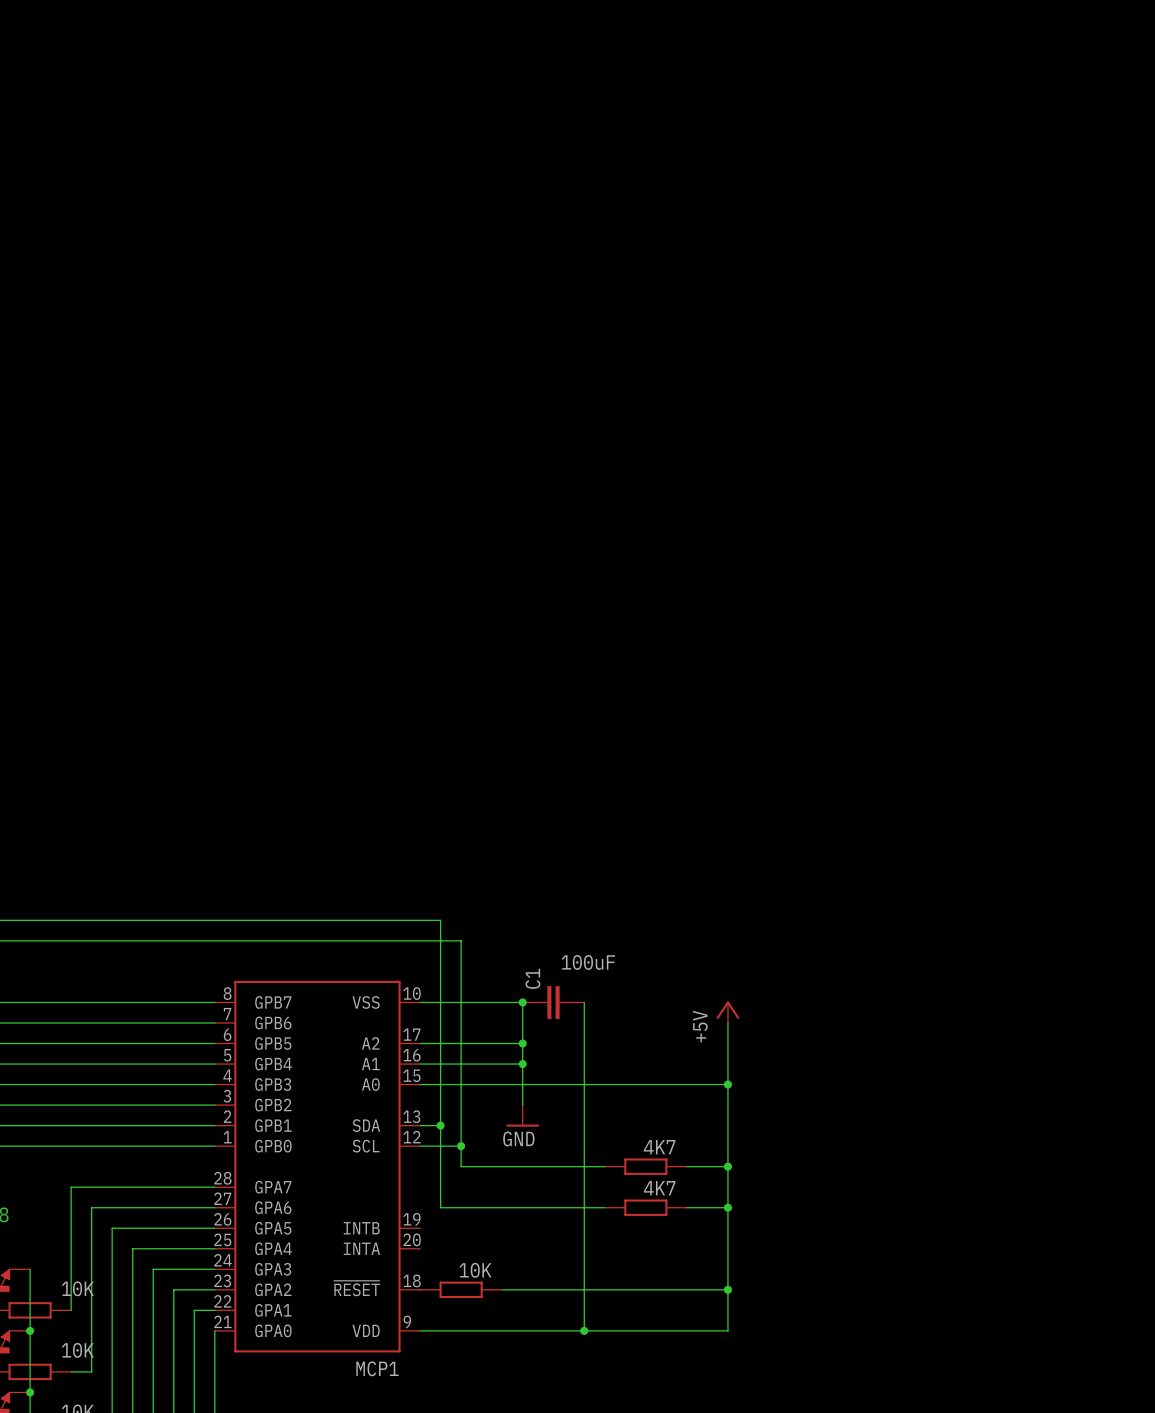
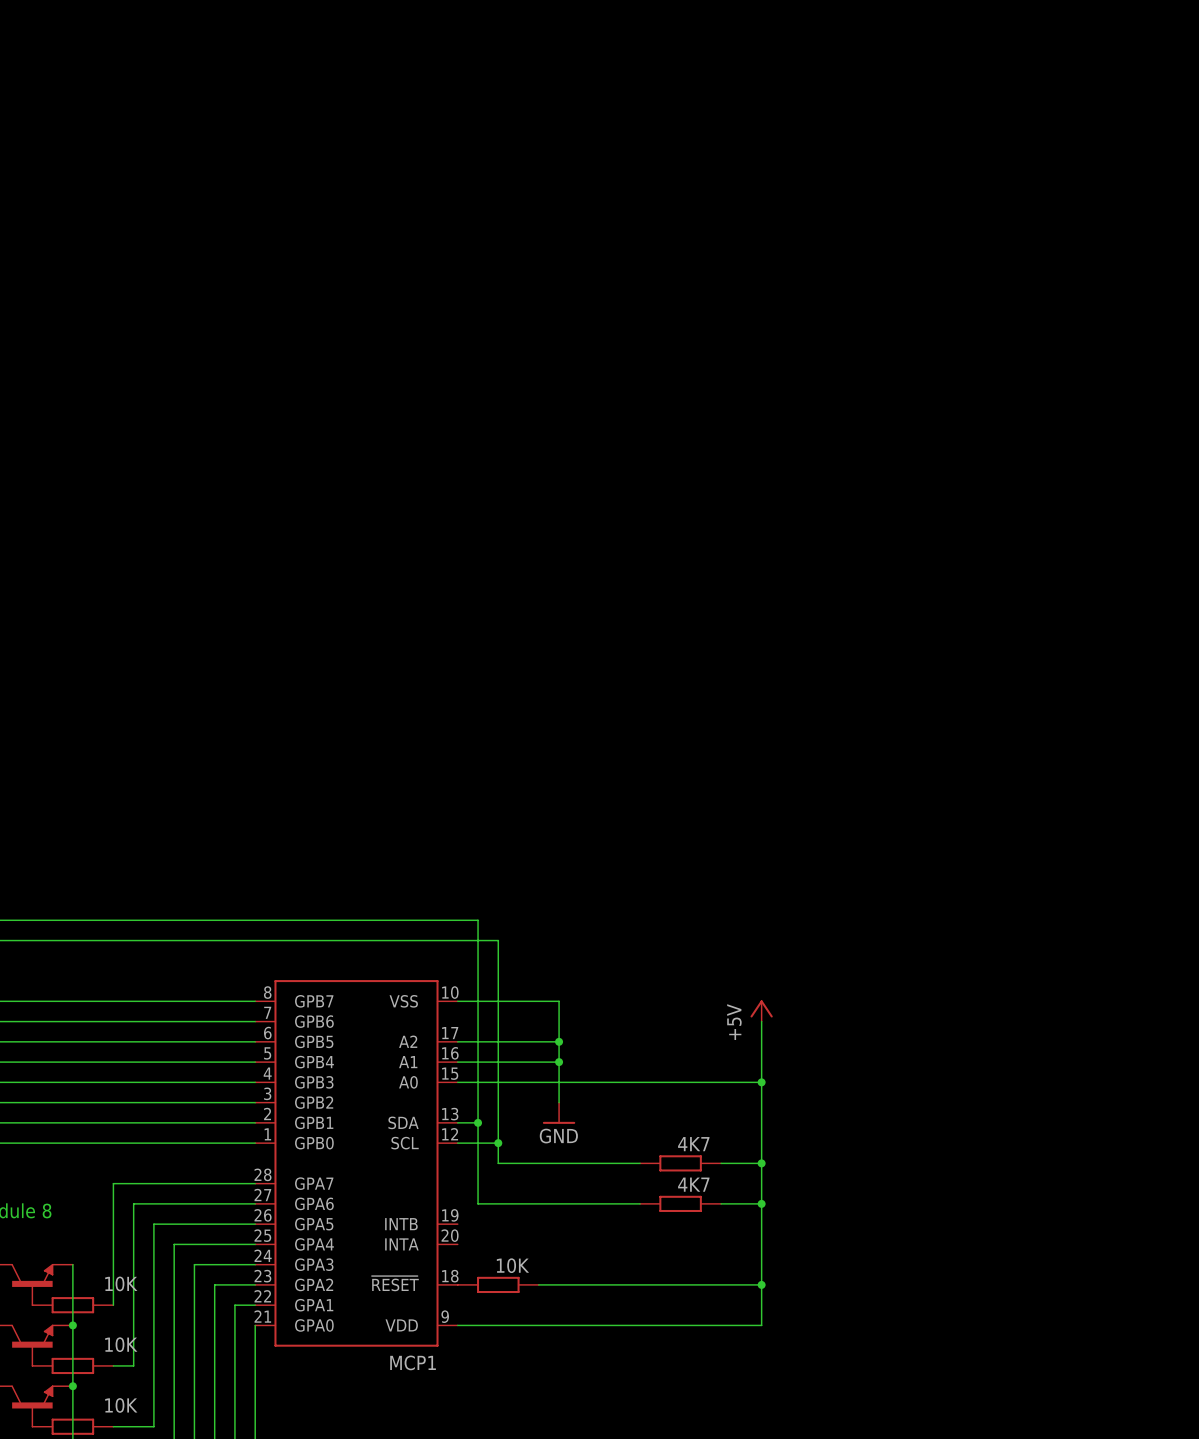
junction: (522, 1002) -> none
C1: 100uF (553, 1002) -> none
wire: (584, 1002) (584, 1330) -> none
junction: (584, 1330) -> none

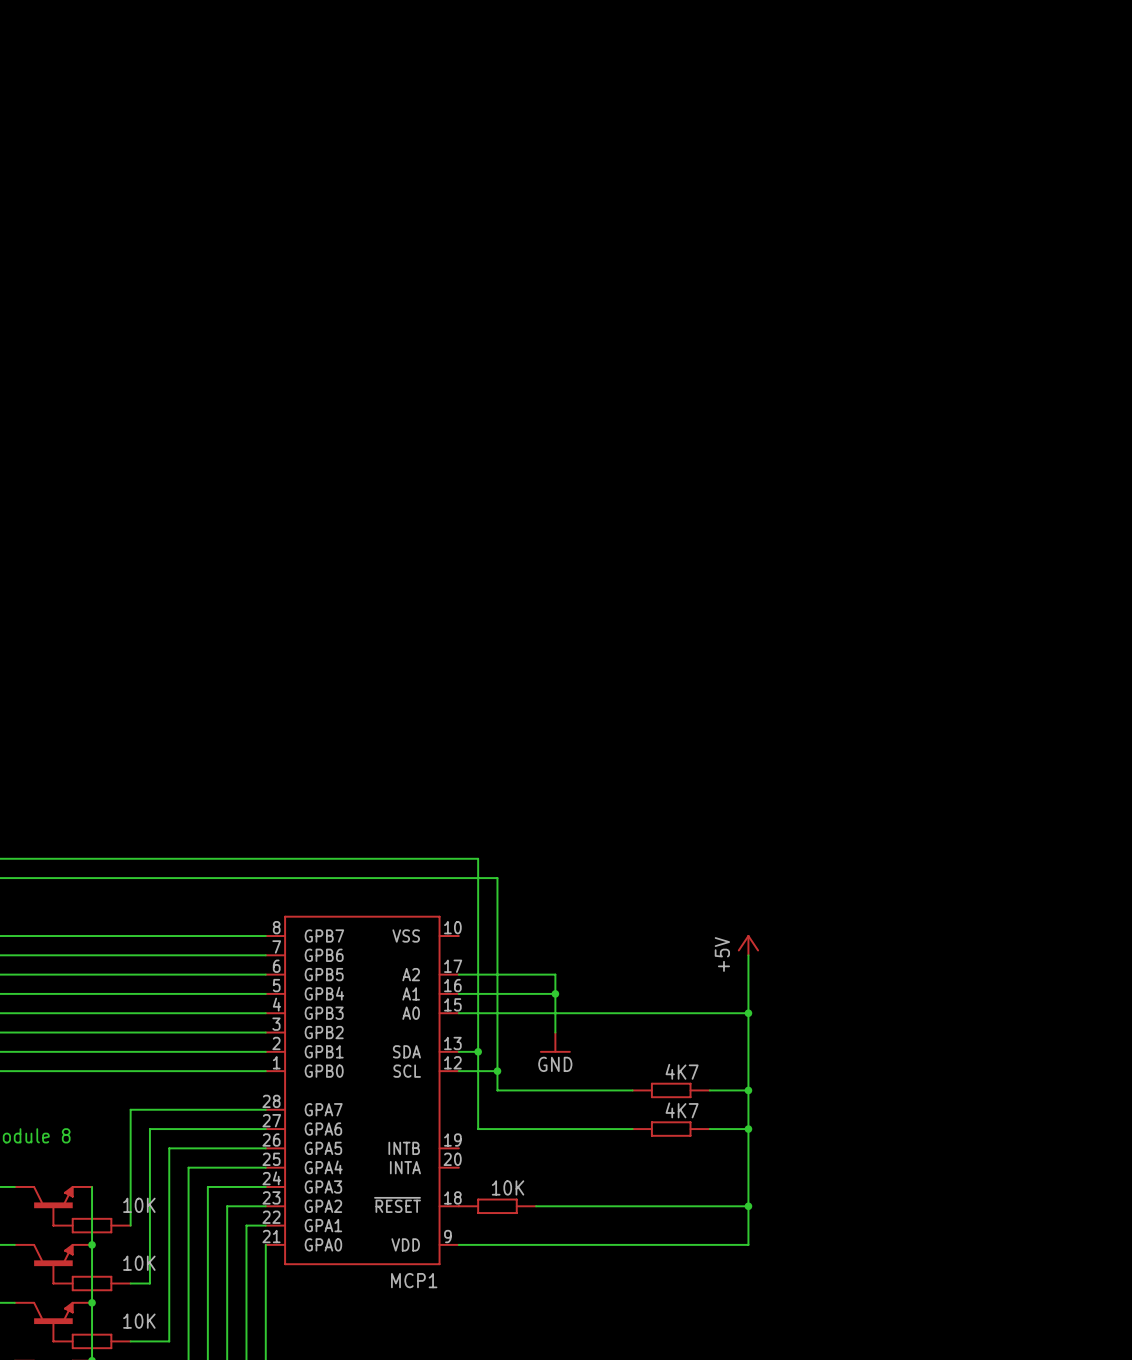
wire: (457, 1001) (559, 1001) (559, 1041) -> none
junction: (559, 1041) -> none

